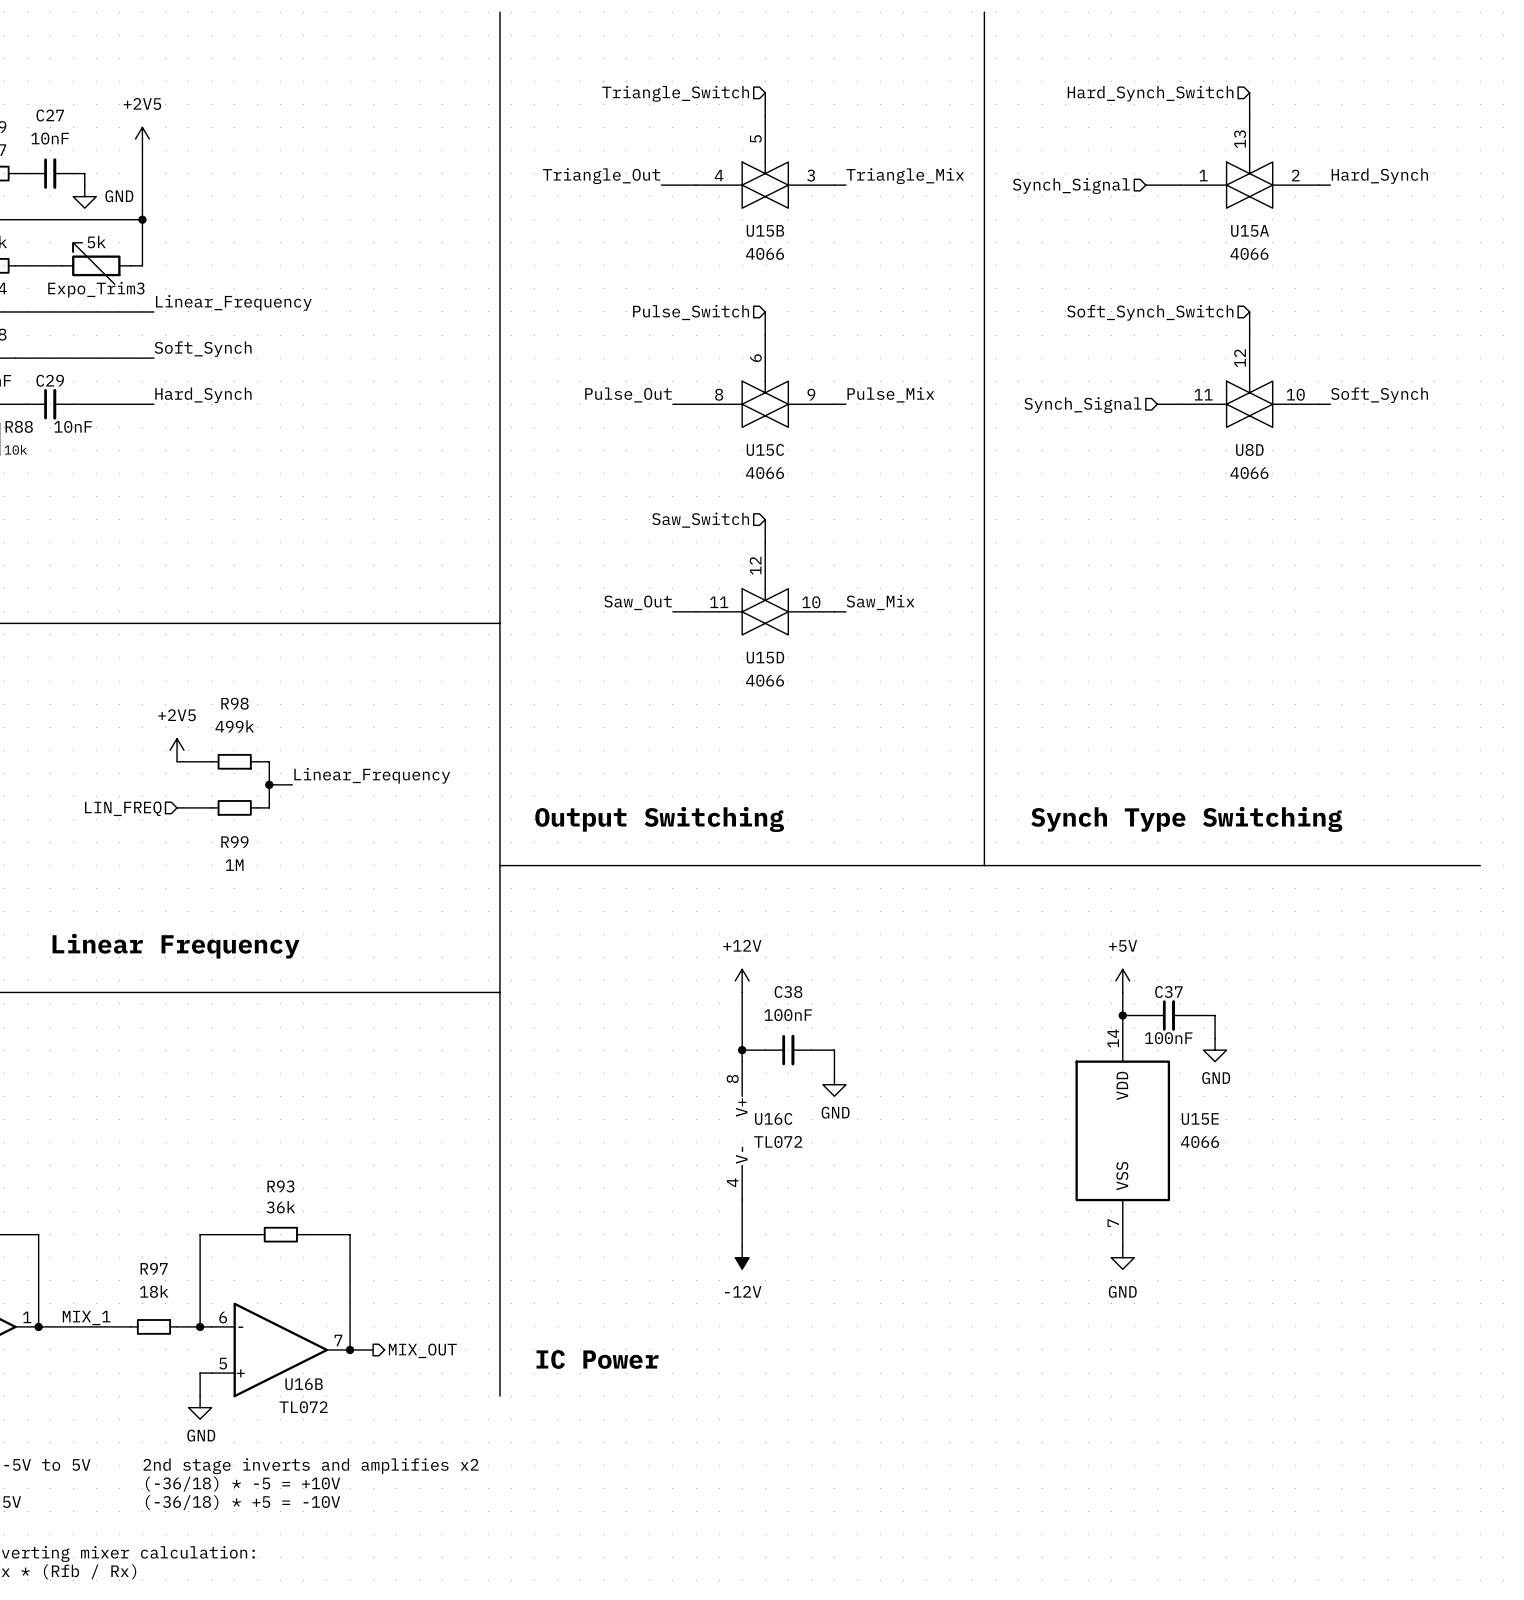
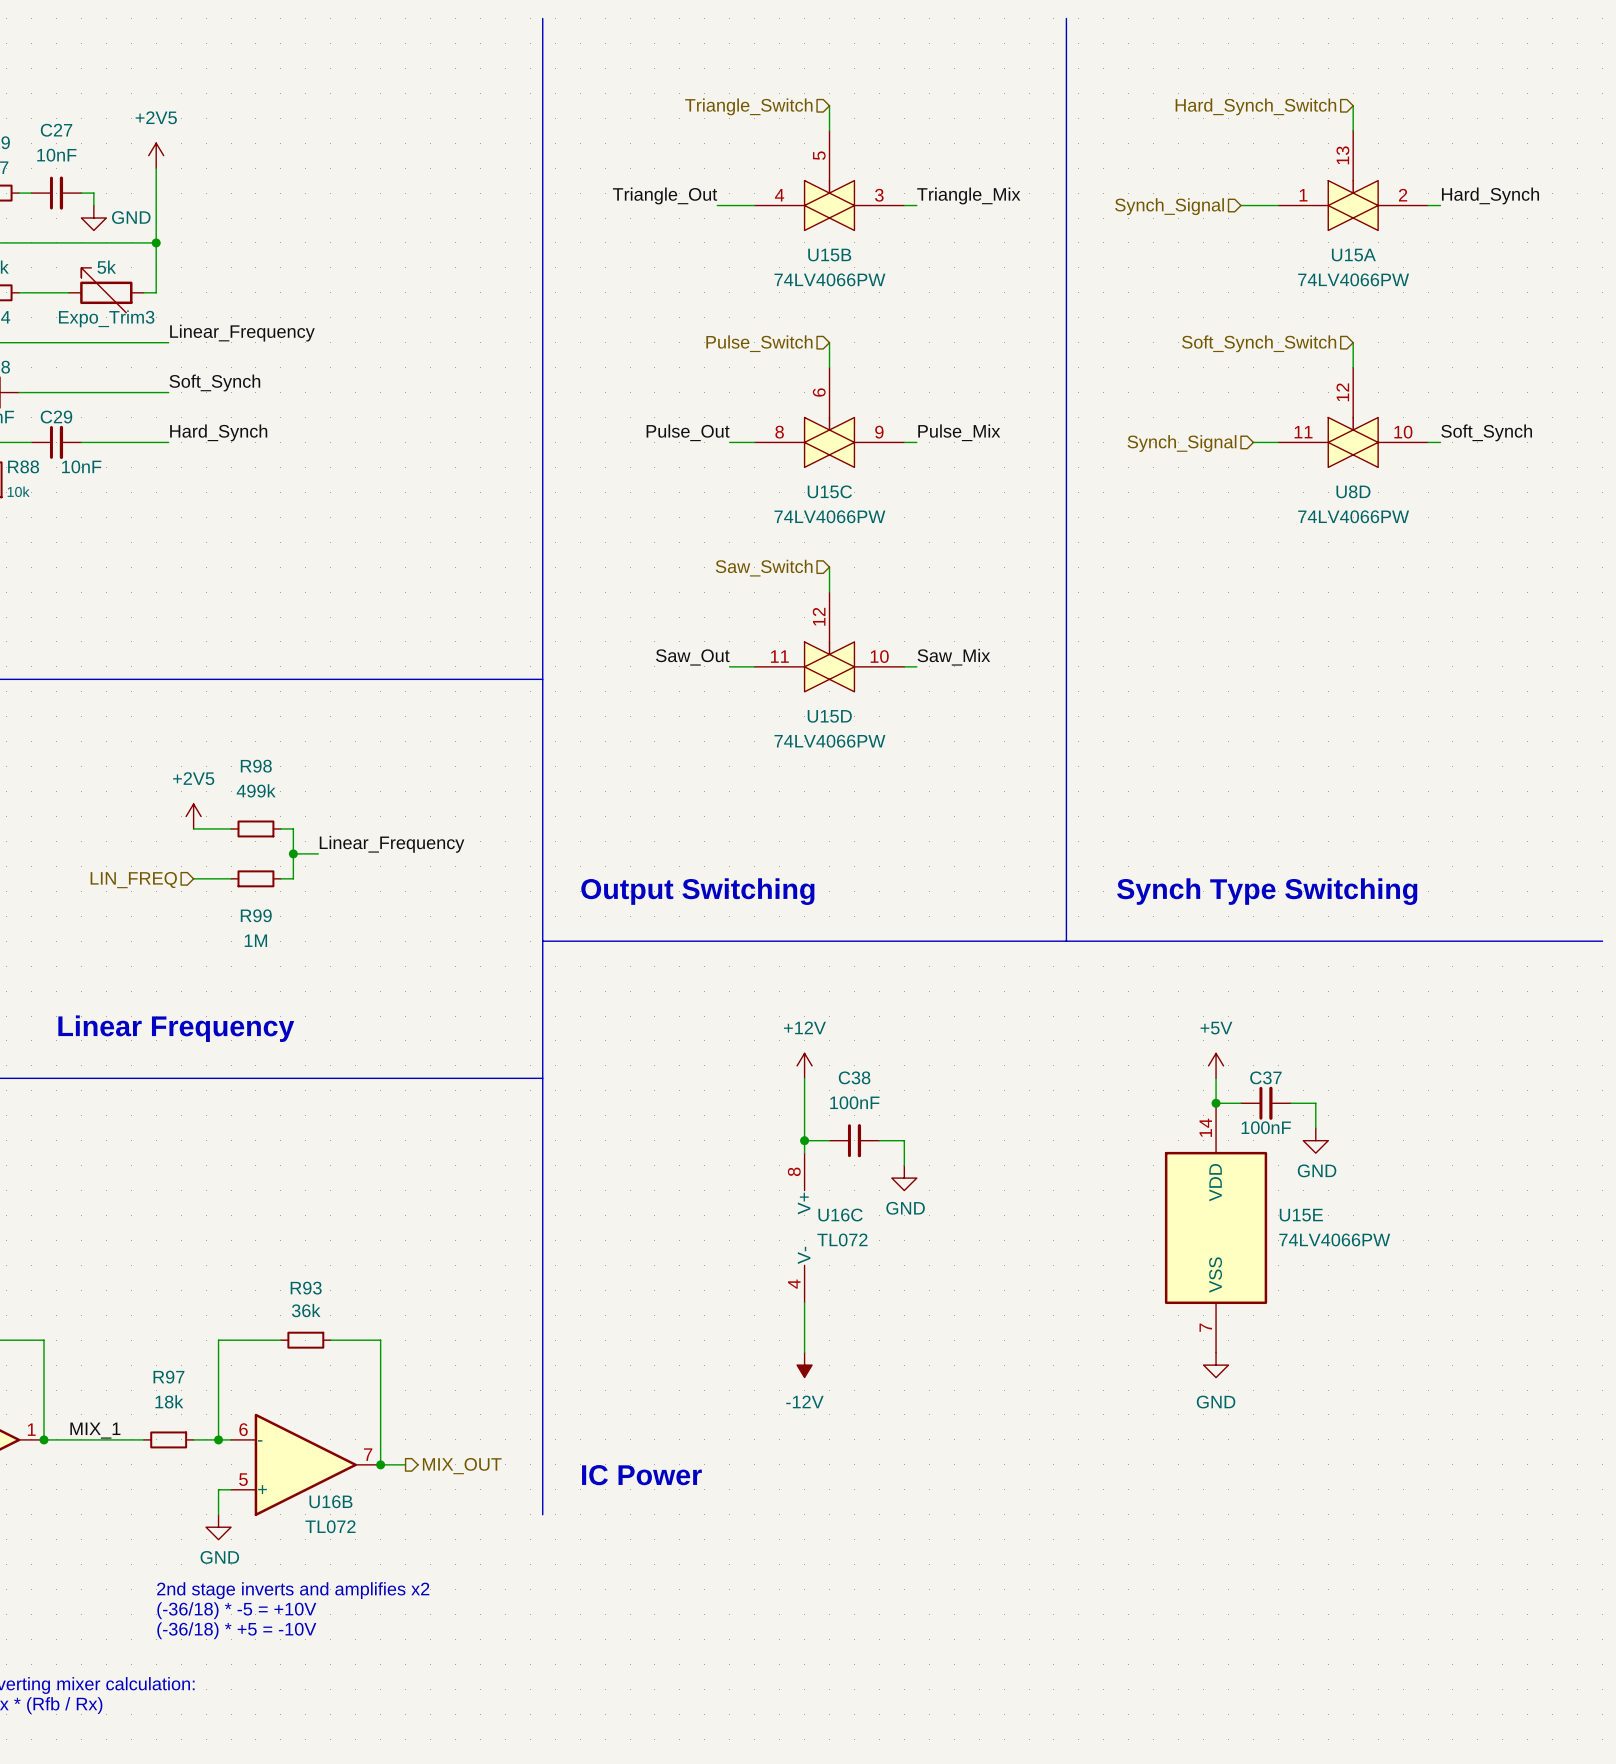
U15B value: 4066 (764, 253) -> 74LV4066PW (829, 279)
U15A value: 4066 (1249, 253) -> 74LV4066PW (1353, 279)
U15C value: 4066 (764, 473) -> 74LV4066PW (829, 516)
U8D value: 4066 (1249, 473) -> 74LV4066PW (1353, 516)
U15D value: 4066 (764, 680) -> 74LV4066PW (829, 741)
U15E value: 4066 (1200, 1141) -> 74LV4066PW (1334, 1239)

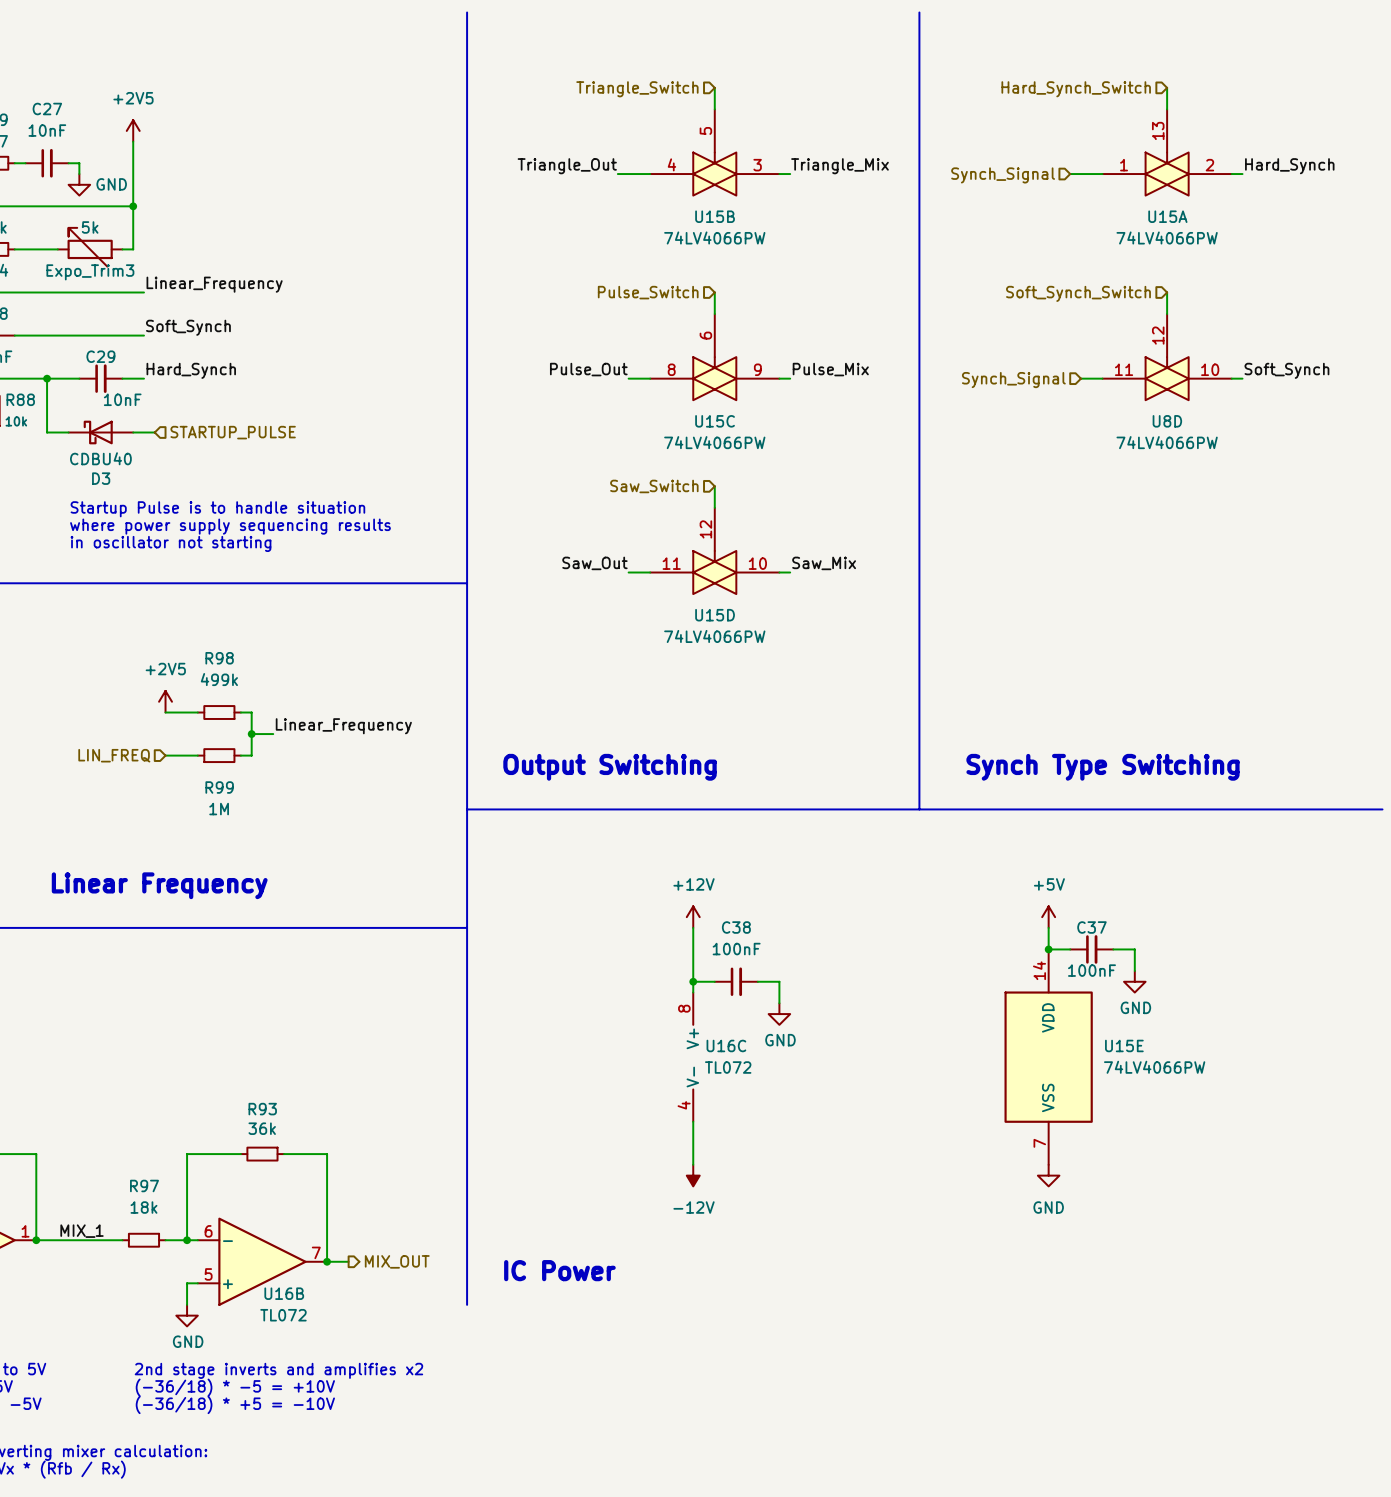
wire: none -> (47, 378) (47, 432) (68, 432)
C29 position: (56, 442) -> (100, 378)
junction: none -> (47, 378)
D3: none -> CDBU40 (100, 432)
wire: none -> (133, 432) (154, 432)
hierarchical label: none -> STARTUP_PULSE (233, 432)
text: none -> Startup Pulse is to handle situation (217, 509)
text: none -> where power supply sequencing results (230, 526)
text: none -> in oscillator not starting (170, 543)

